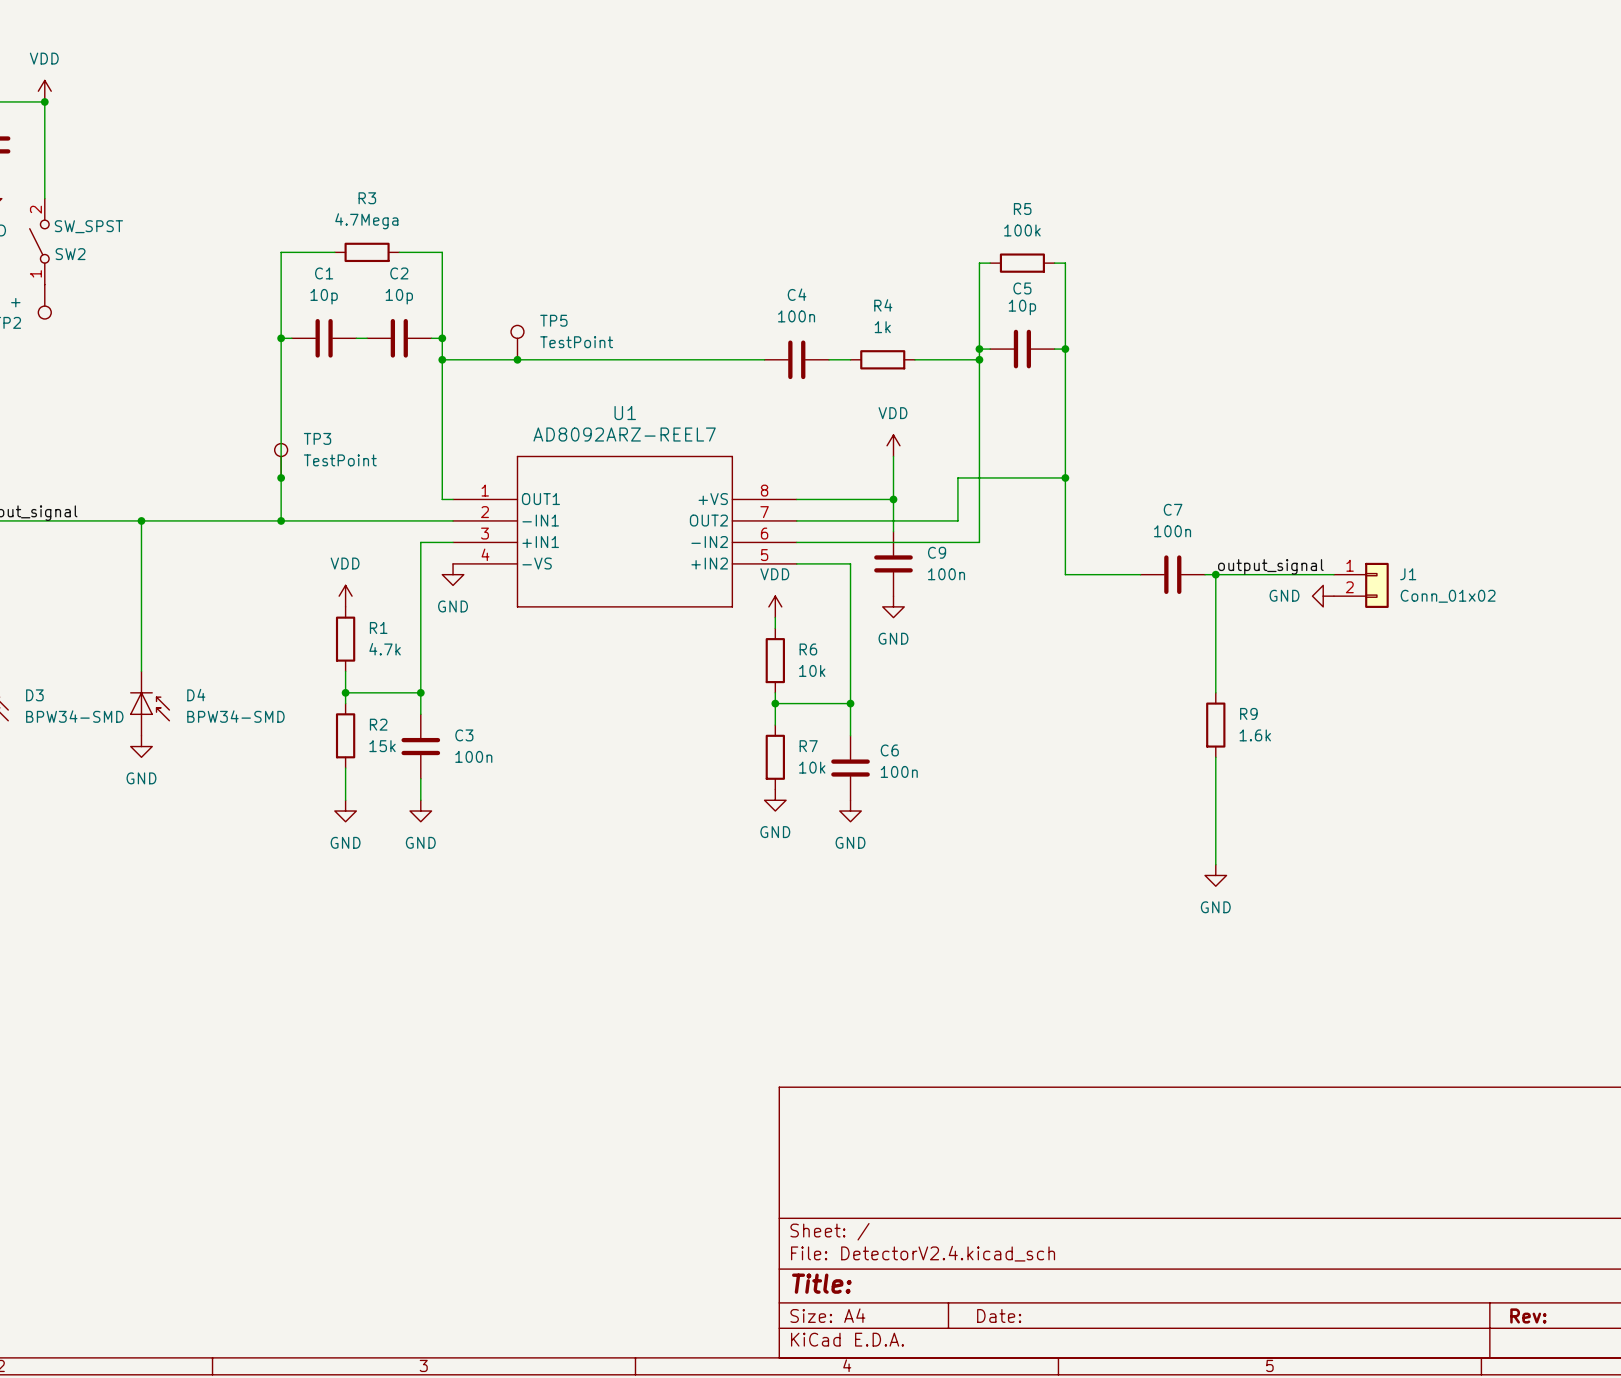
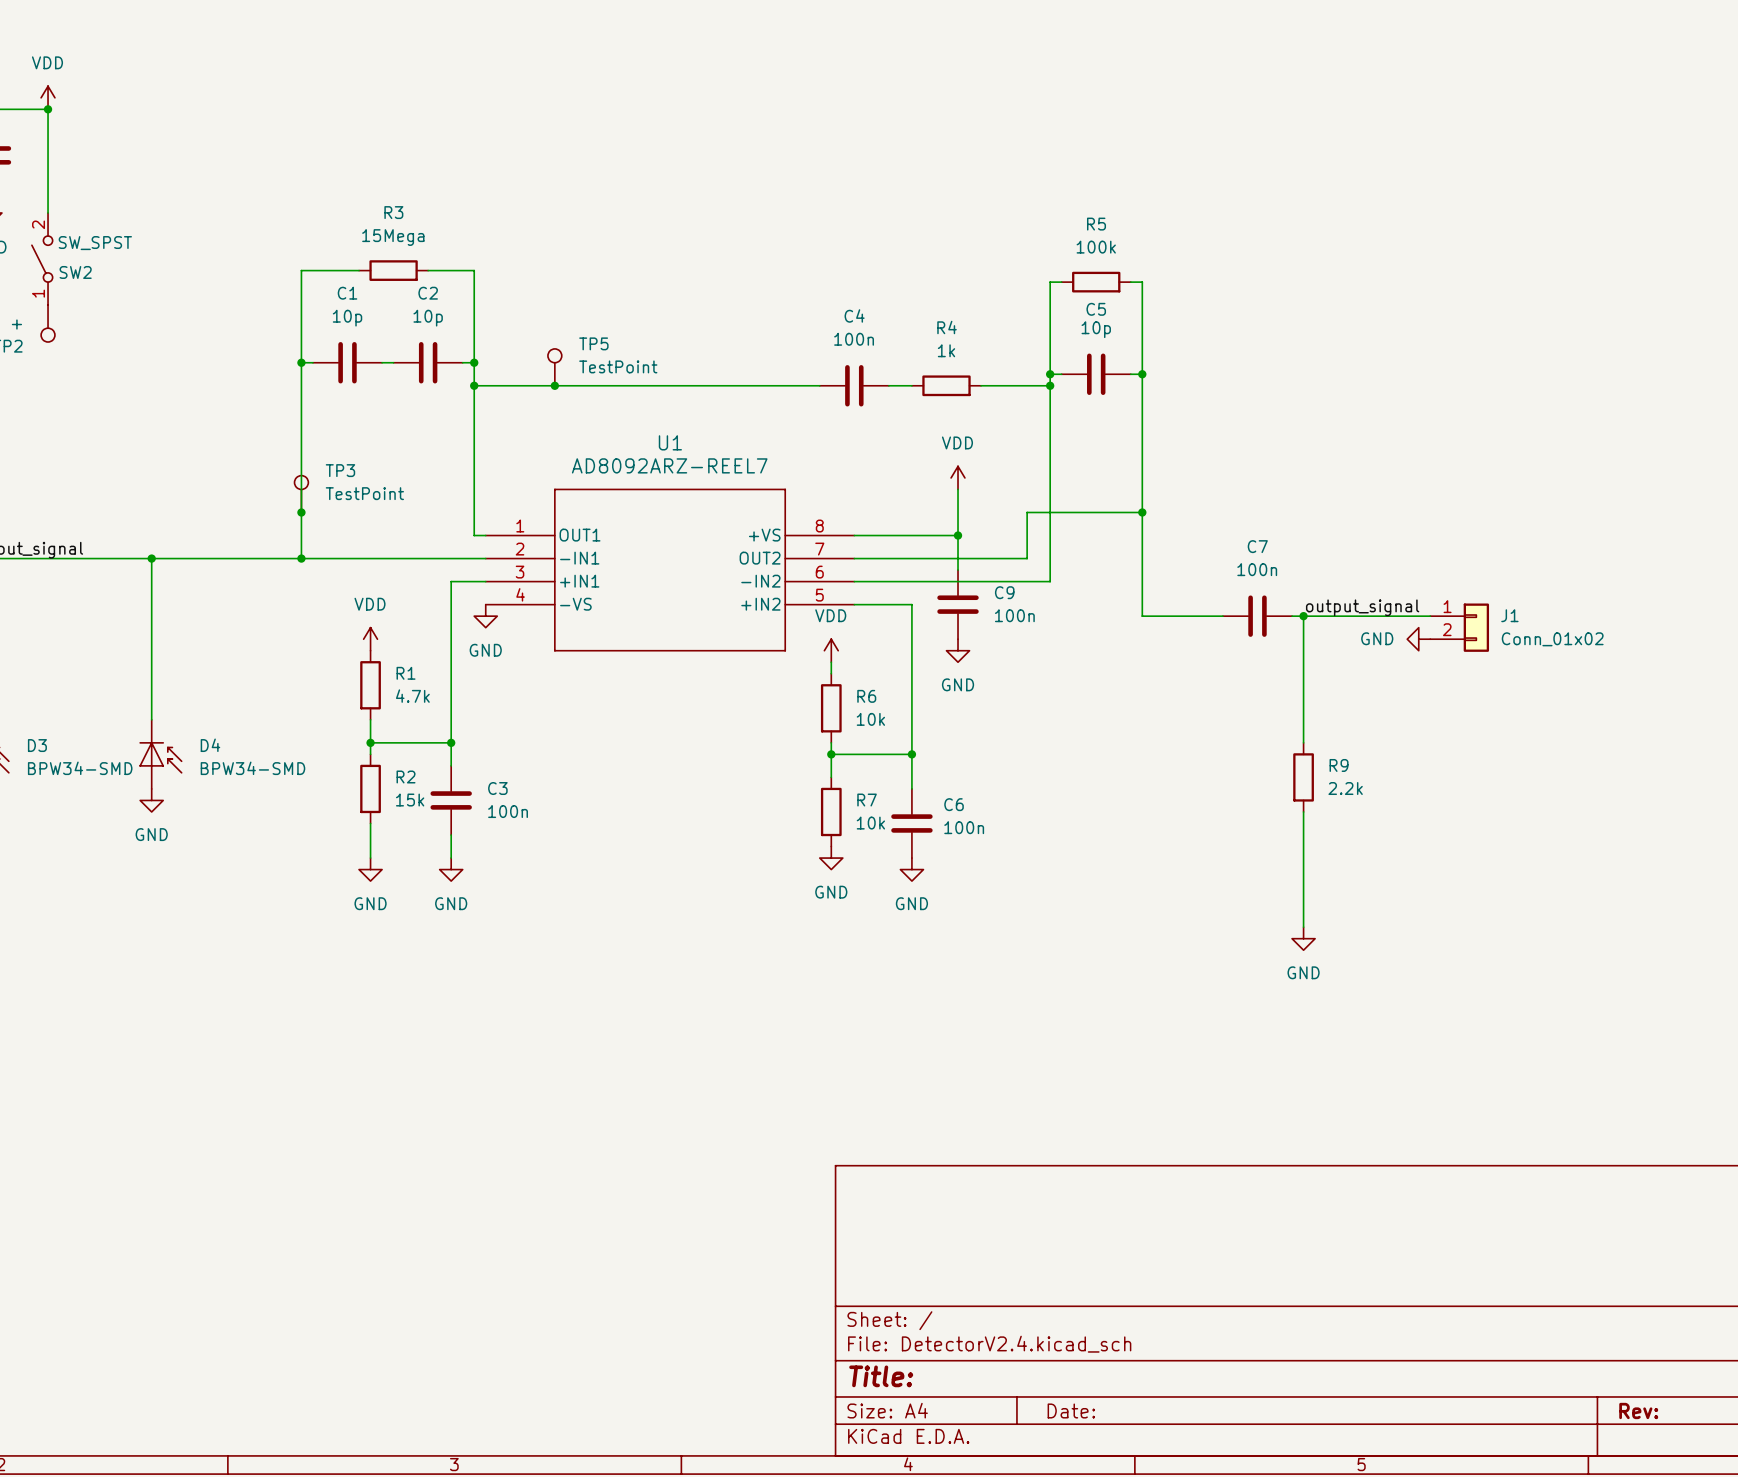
R3 value: 4.7Mega (366, 221) -> 15Mega (393, 237)
R9 value: 1.6k (1255, 735) -> 2.2k (1345, 788)

